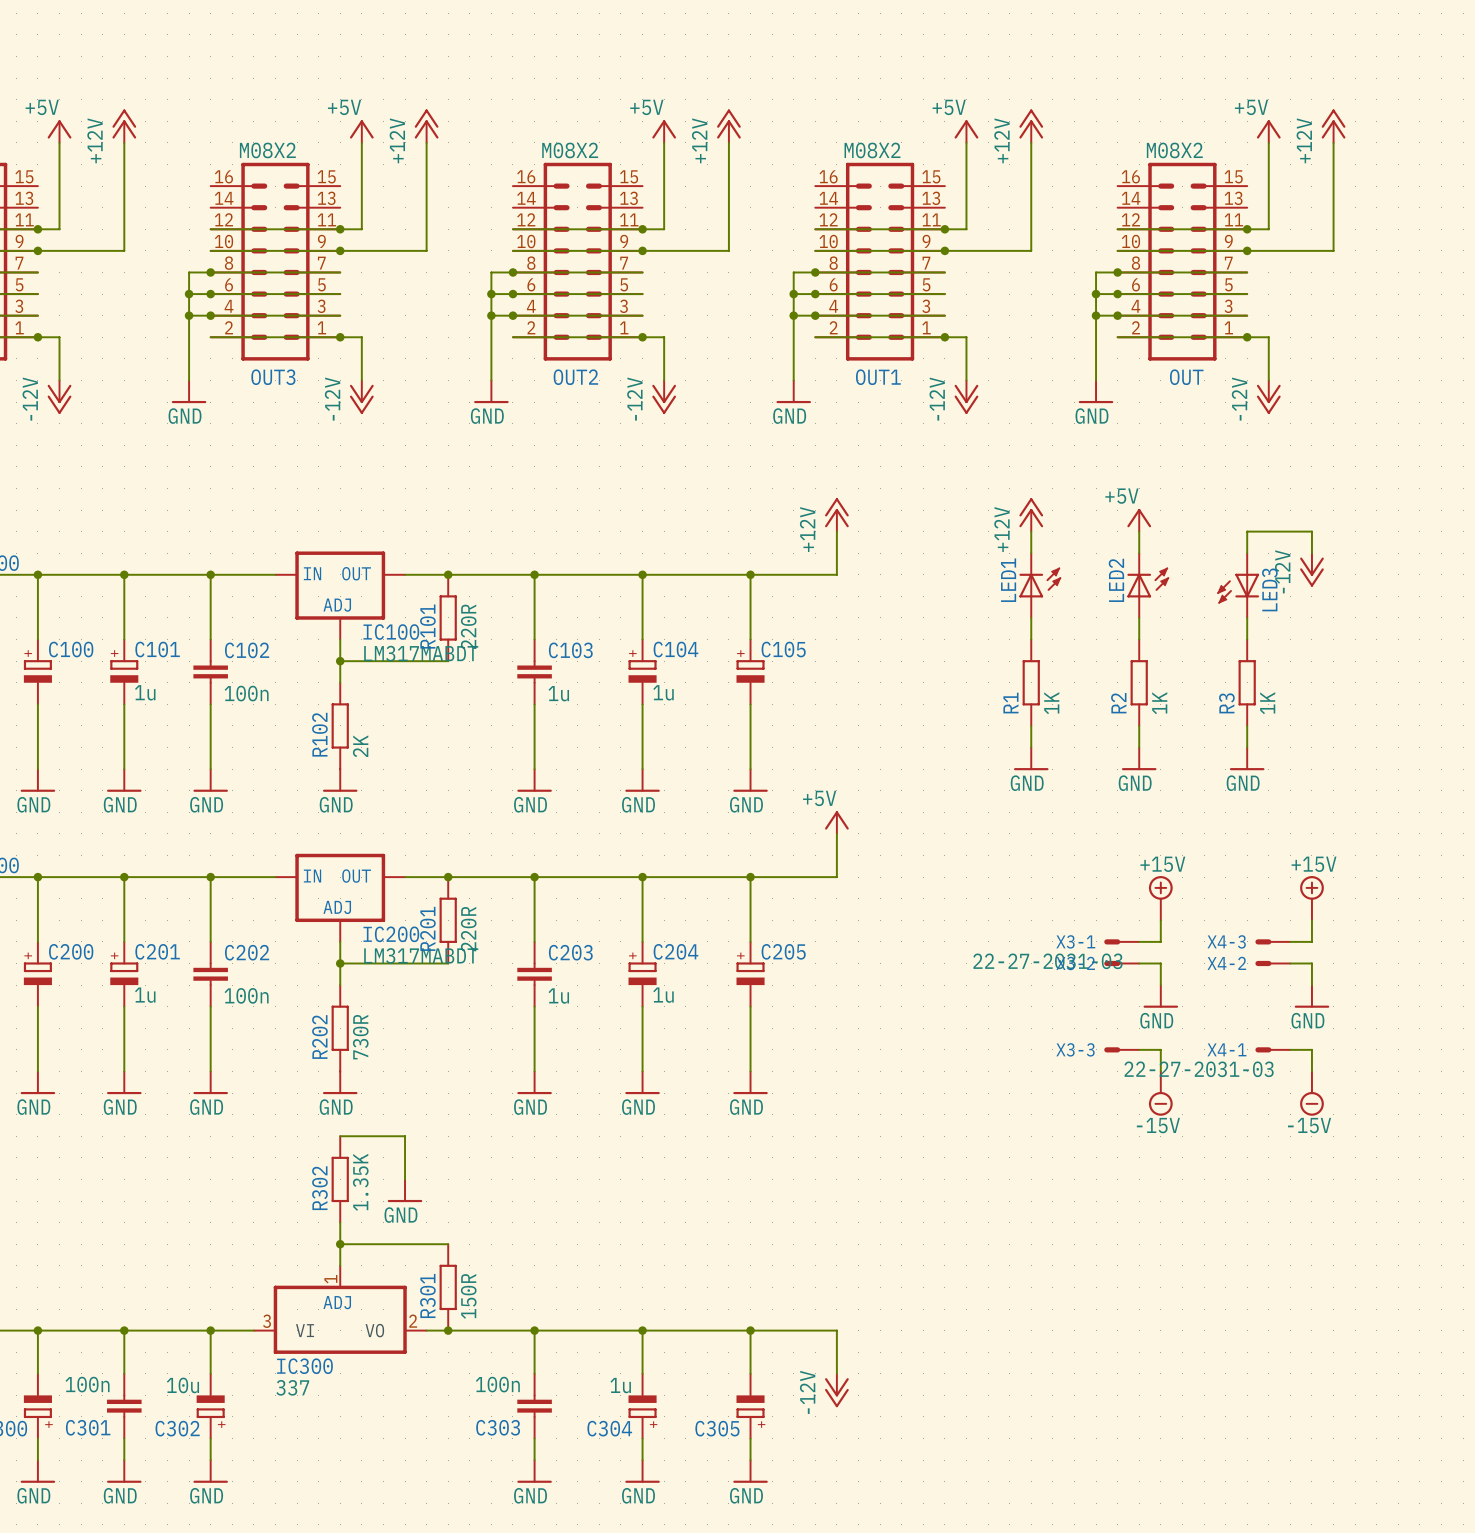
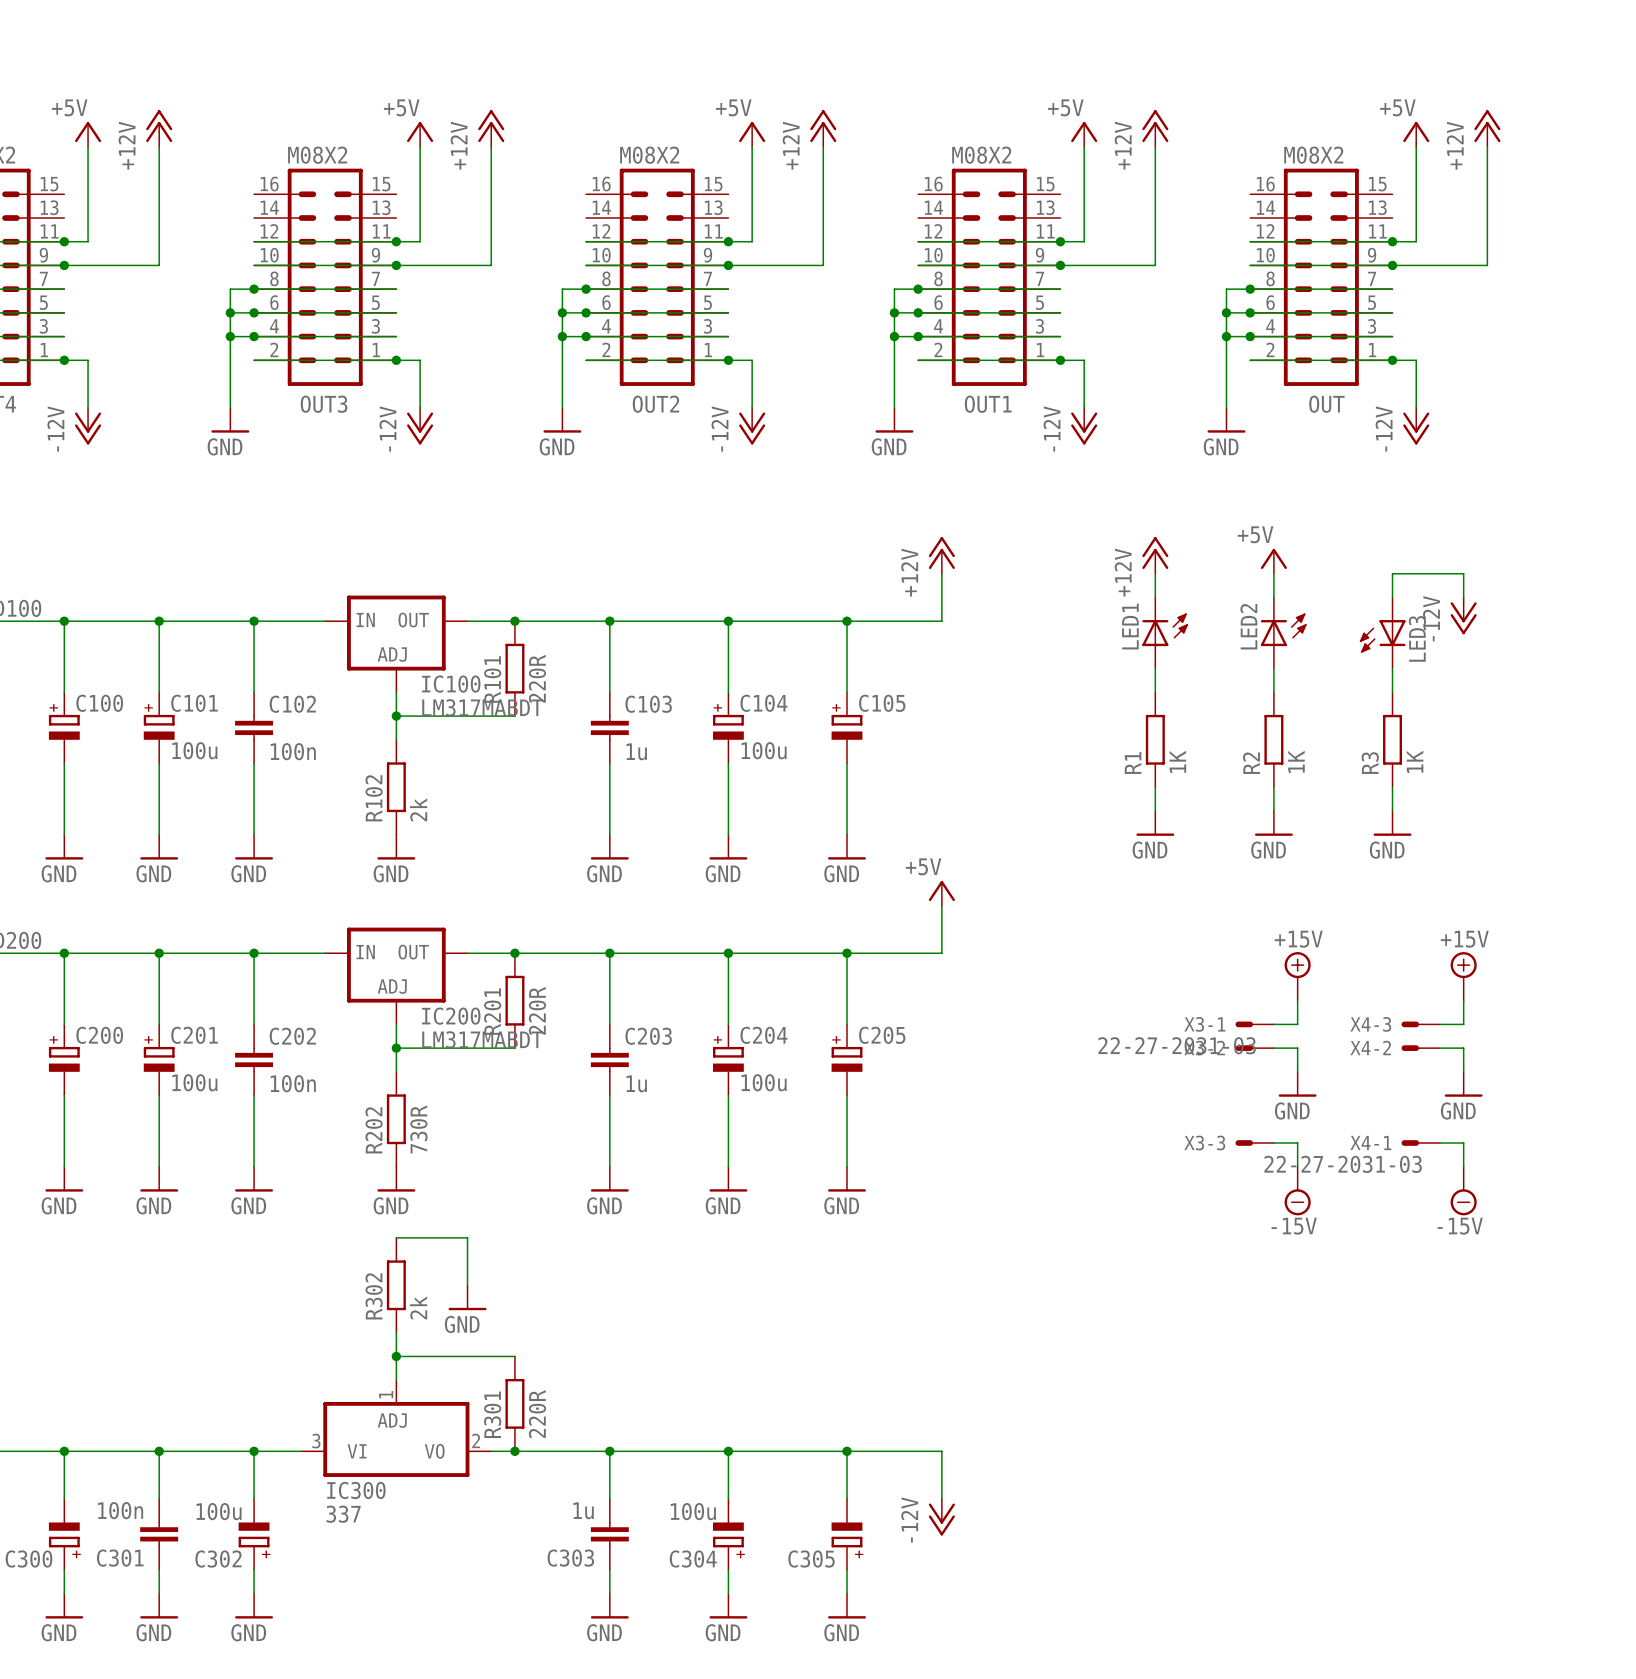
C101 value: 1u (145, 692) -> 100u (194, 750)
C104 value: 1u (663, 692) -> 100u (764, 750)
R102 value: 2K (360, 746) -> 2k (418, 809)
C201 value: 1u (145, 995) -> 100u (194, 1082)
C204 value: 1u (663, 995) -> 100u (764, 1082)
R302 value: 1.35K (360, 1182) -> 2k (418, 1307)
R301 value: 150R (468, 1296) -> 220R (537, 1414)
C303 value: 100n (497, 1384) -> 1u (583, 1510)
C302 value: 10u (182, 1385) -> 100u (219, 1511)
C304 value: 1u (620, 1385) -> 100u (693, 1511)

